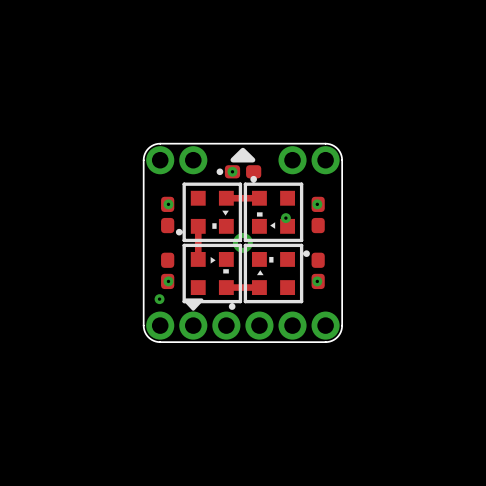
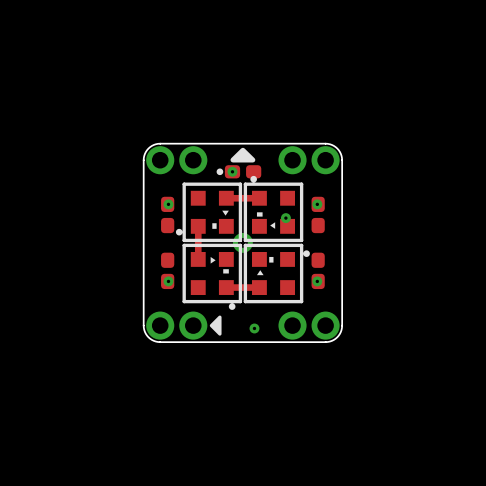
part footprint: [142, 142, 343, 343] -> [142, 142, 343, 343]
drawing: [183, 298, 204, 311] -> none
via position: (159, 299) -> (254, 328)
drawing: none -> [209, 315, 222, 336]

